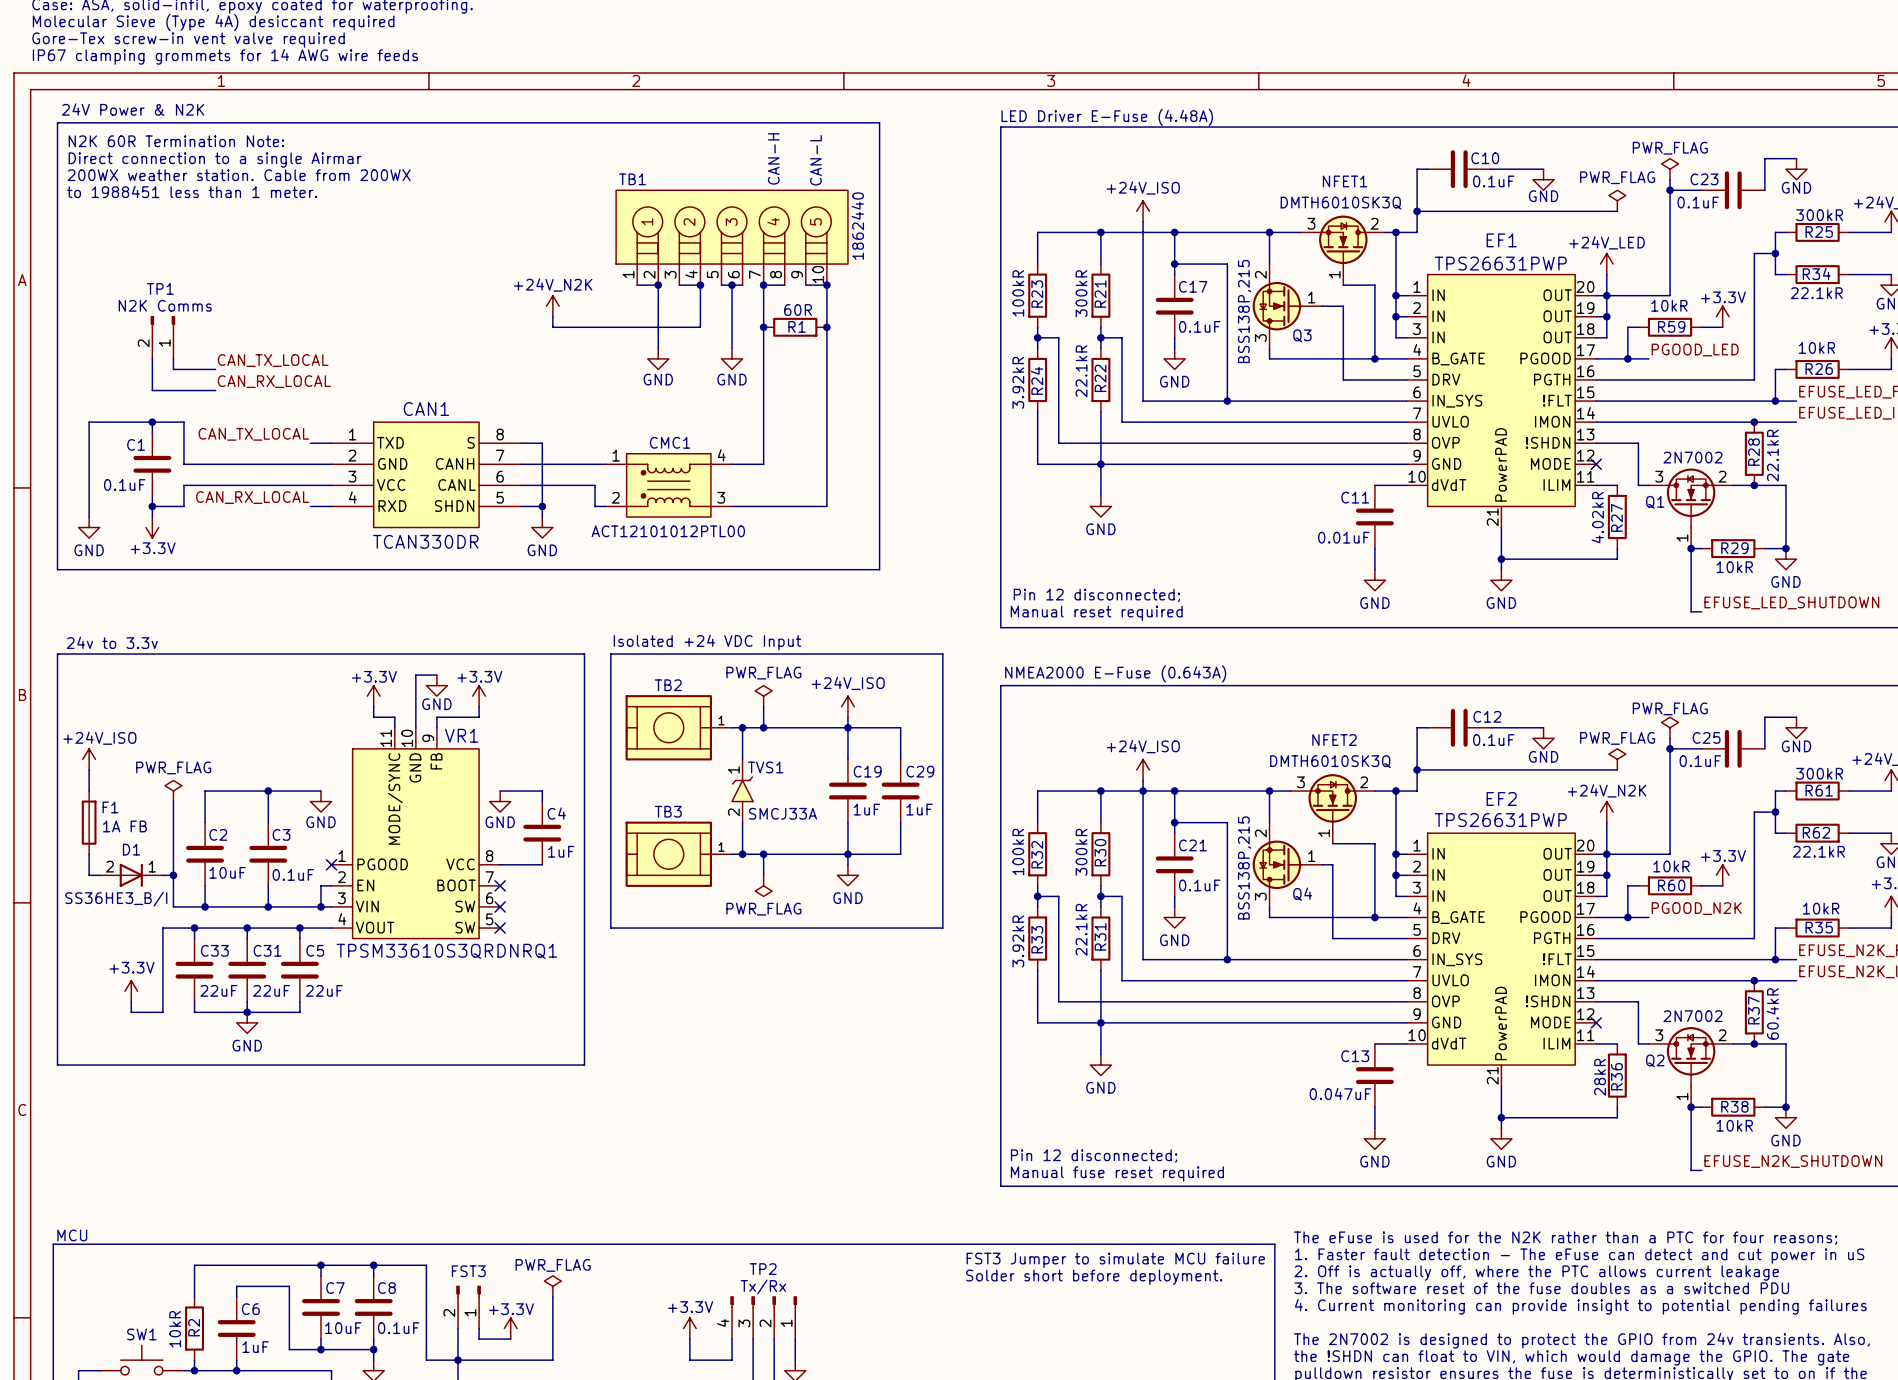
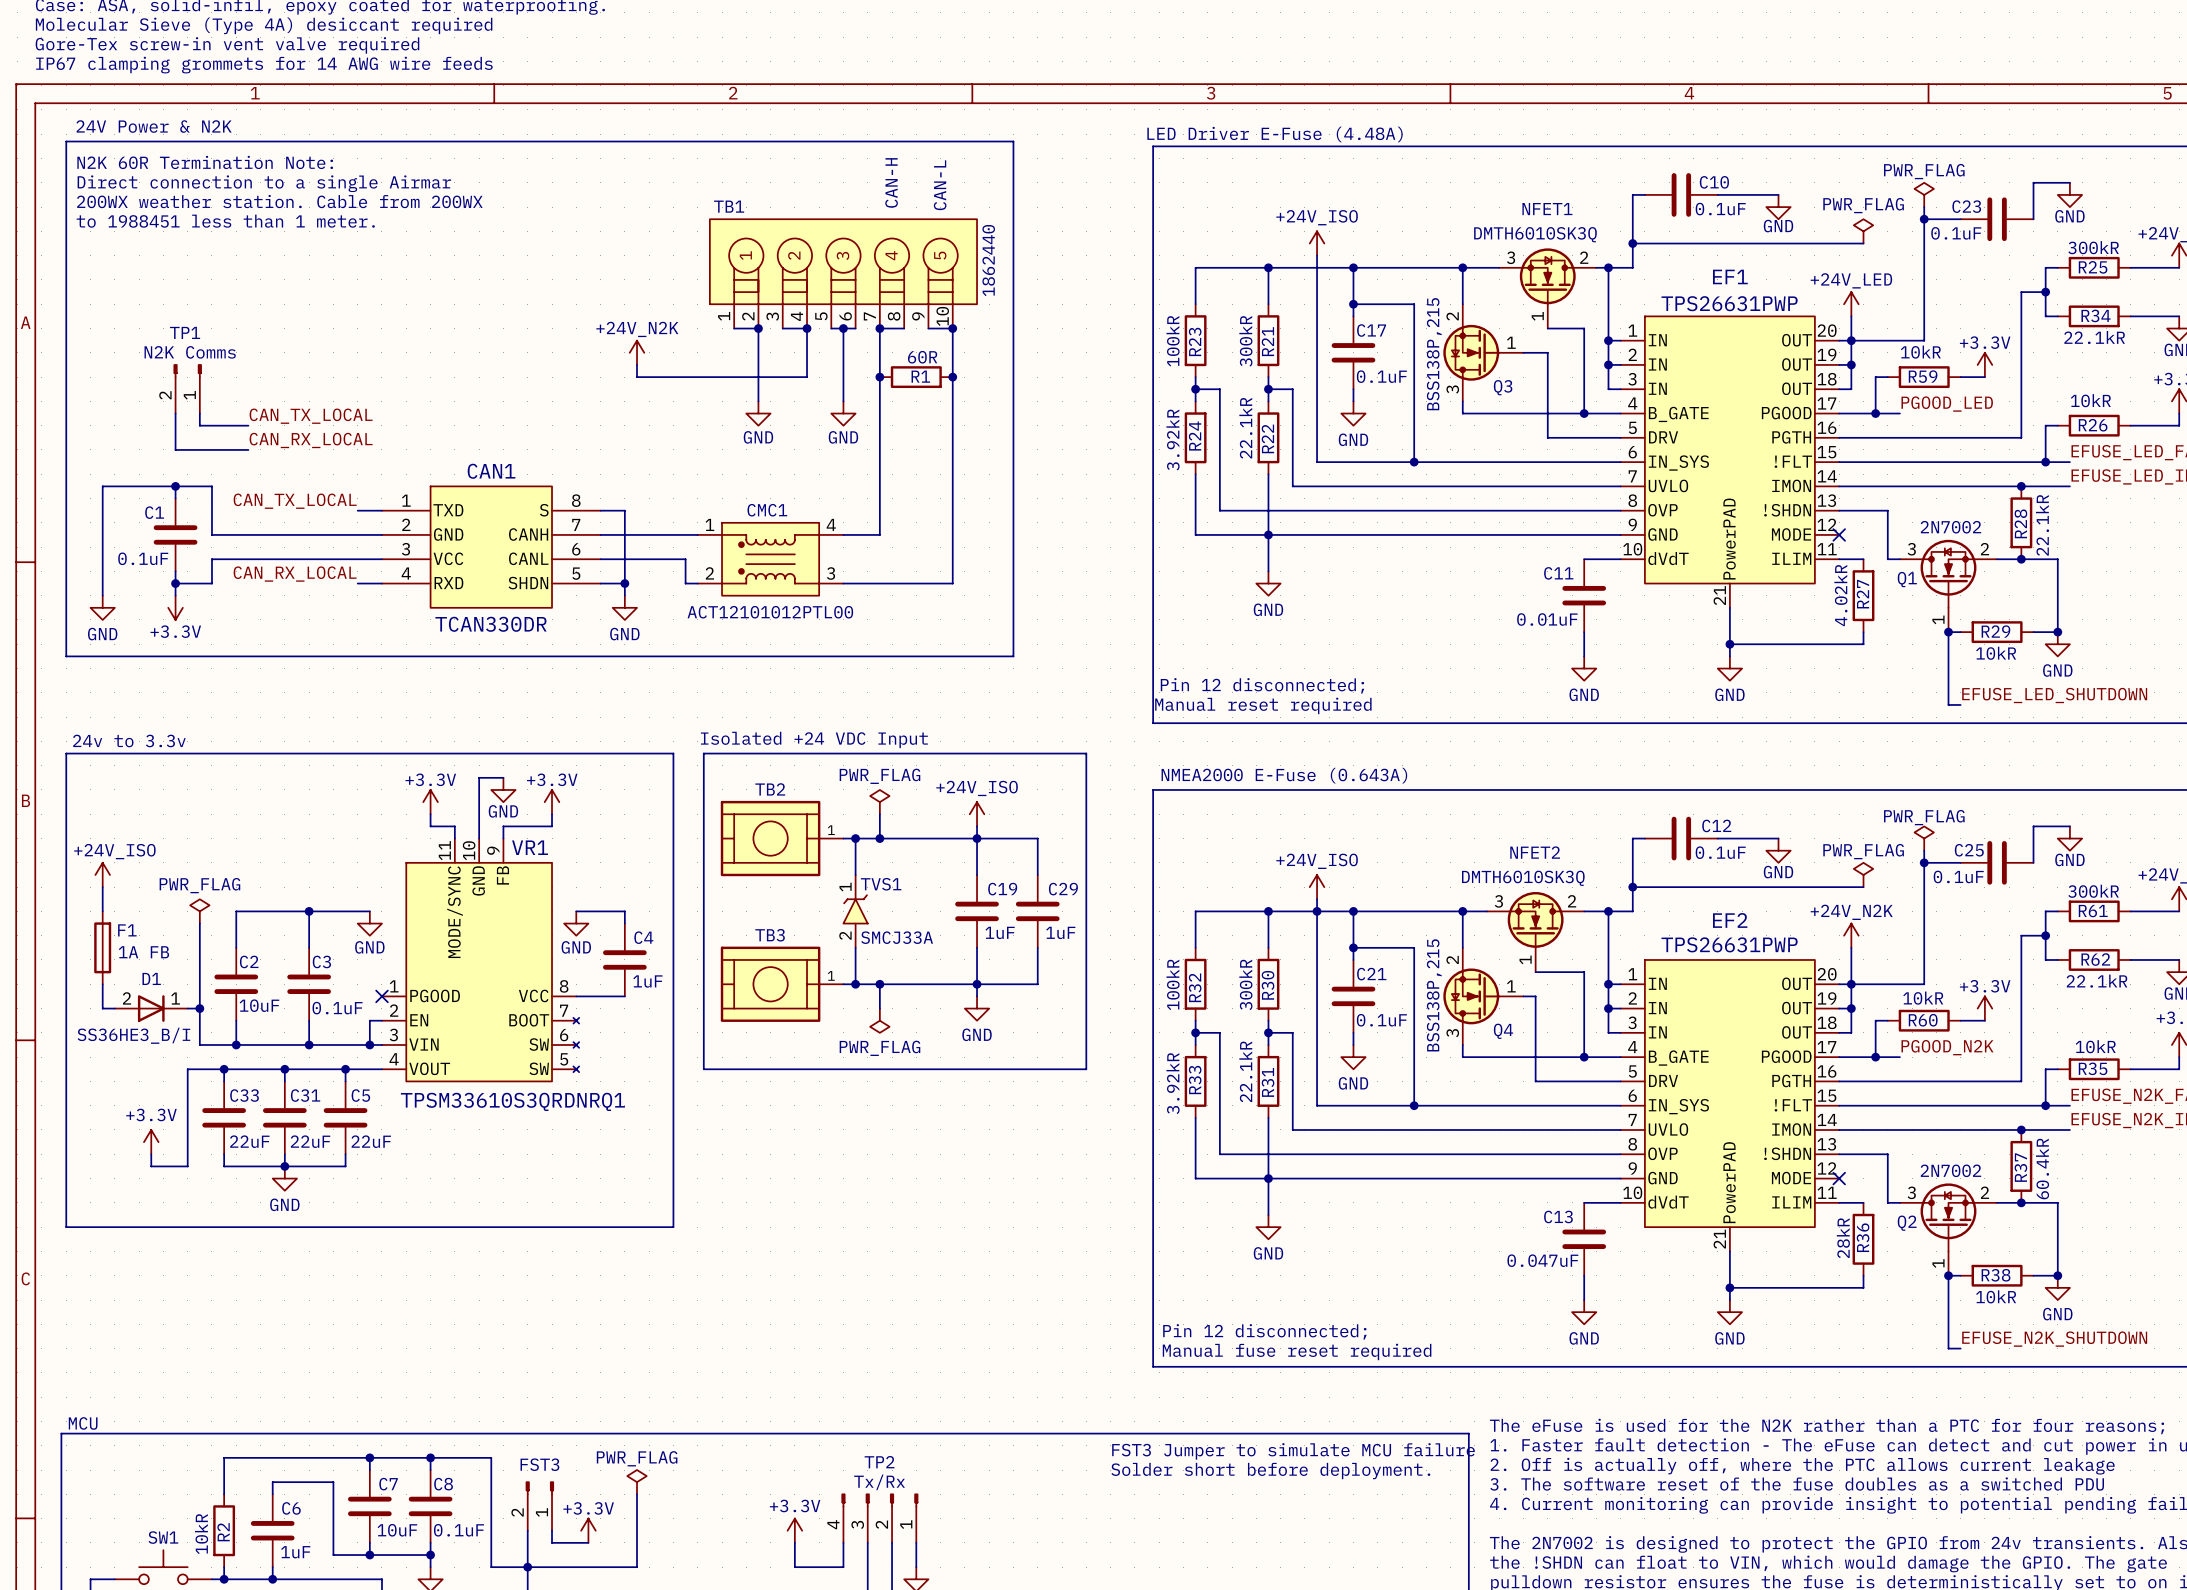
VR1 symbol: [331, 727, 501, 939] -> [381, 838, 580, 1082]
no-connect mark: (500, 885) -> none
no-connect mark: (500, 906) -> none
no-connect mark: (500, 928) -> none

